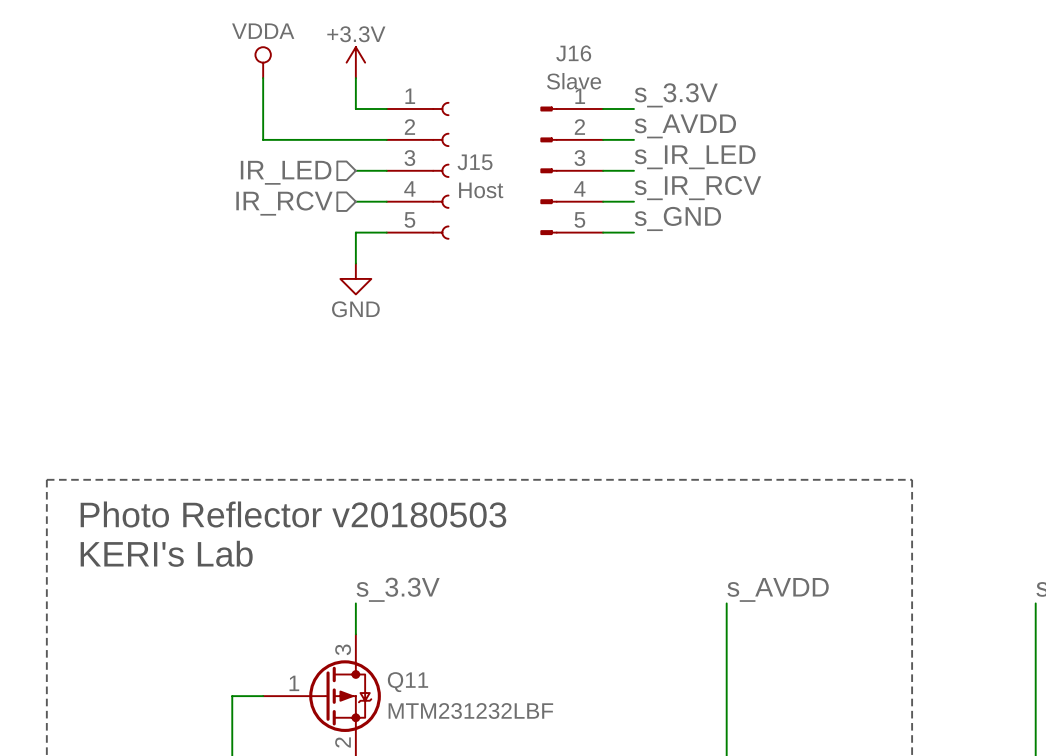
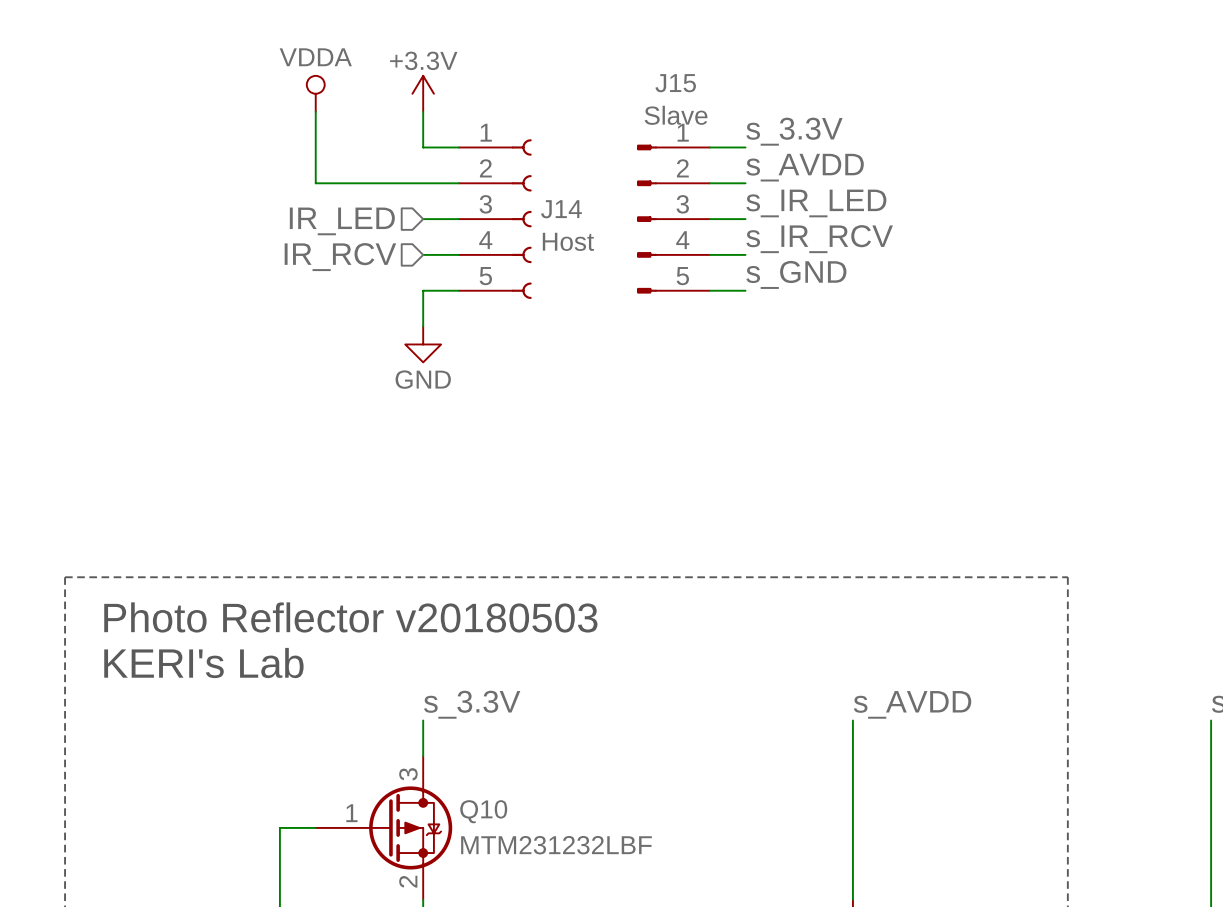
J16 name: J16 (573, 53) -> J15 (675, 83)
J15 name: J15 (475, 162) -> J14 (561, 209)
Q11 name: Q11 (407, 682) -> Q10 (483, 811)

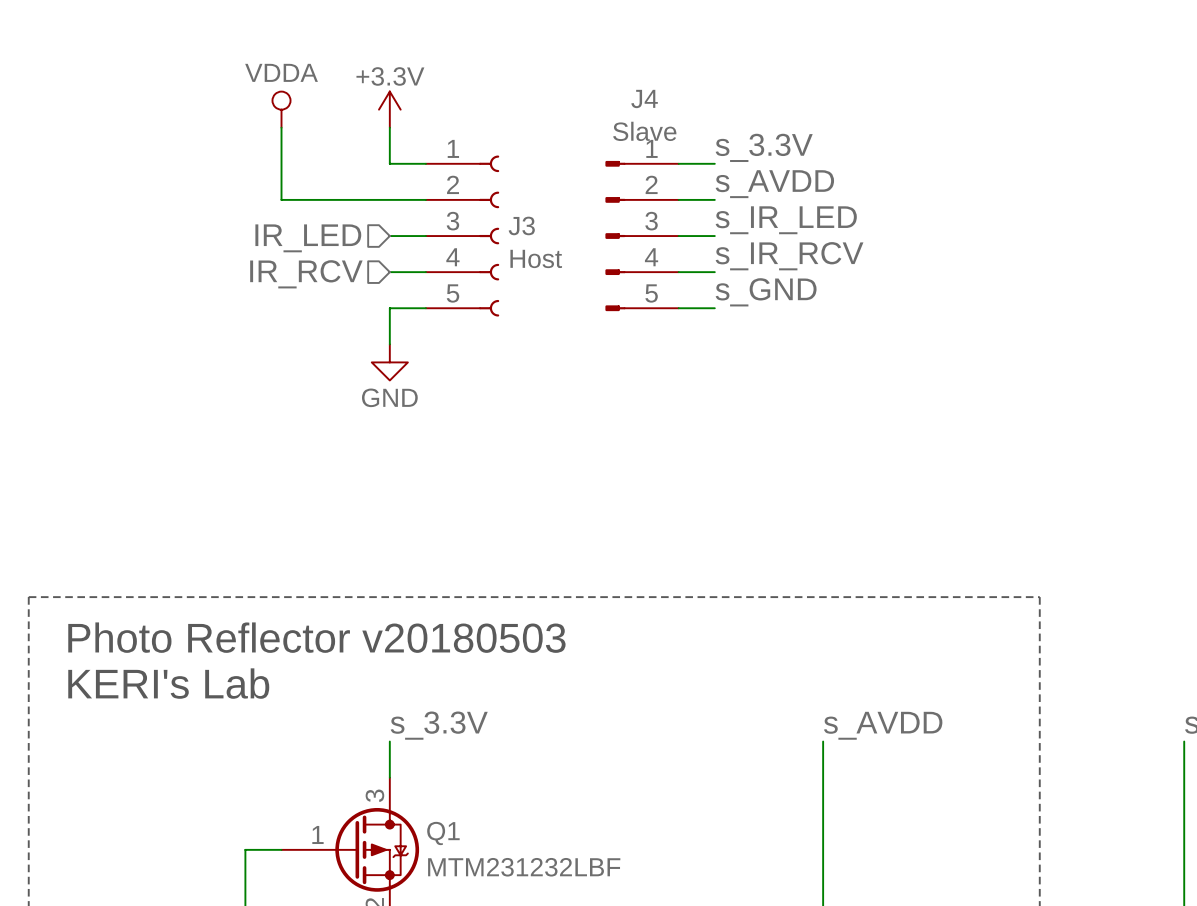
J15 name: J15 (675, 83) -> J4 (644, 98)
J14 name: J14 (561, 209) -> J3 (521, 225)
Q10 name: Q10 (483, 811) -> Q1 (443, 833)

